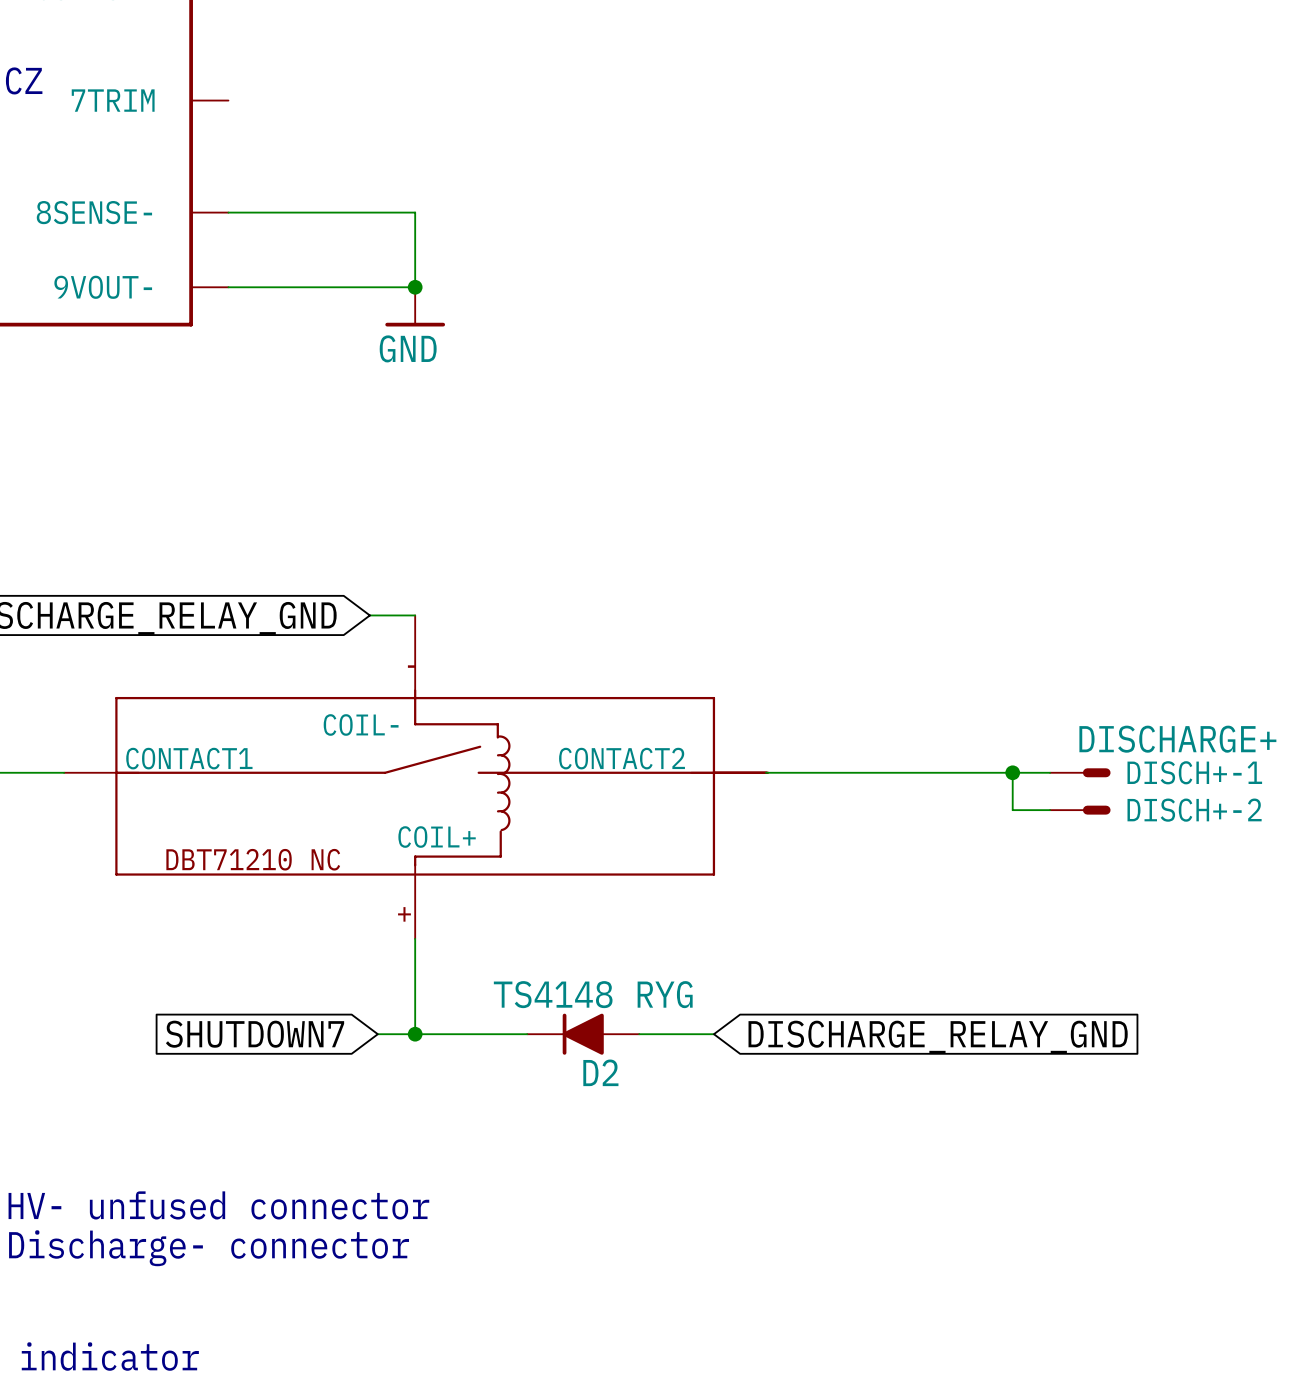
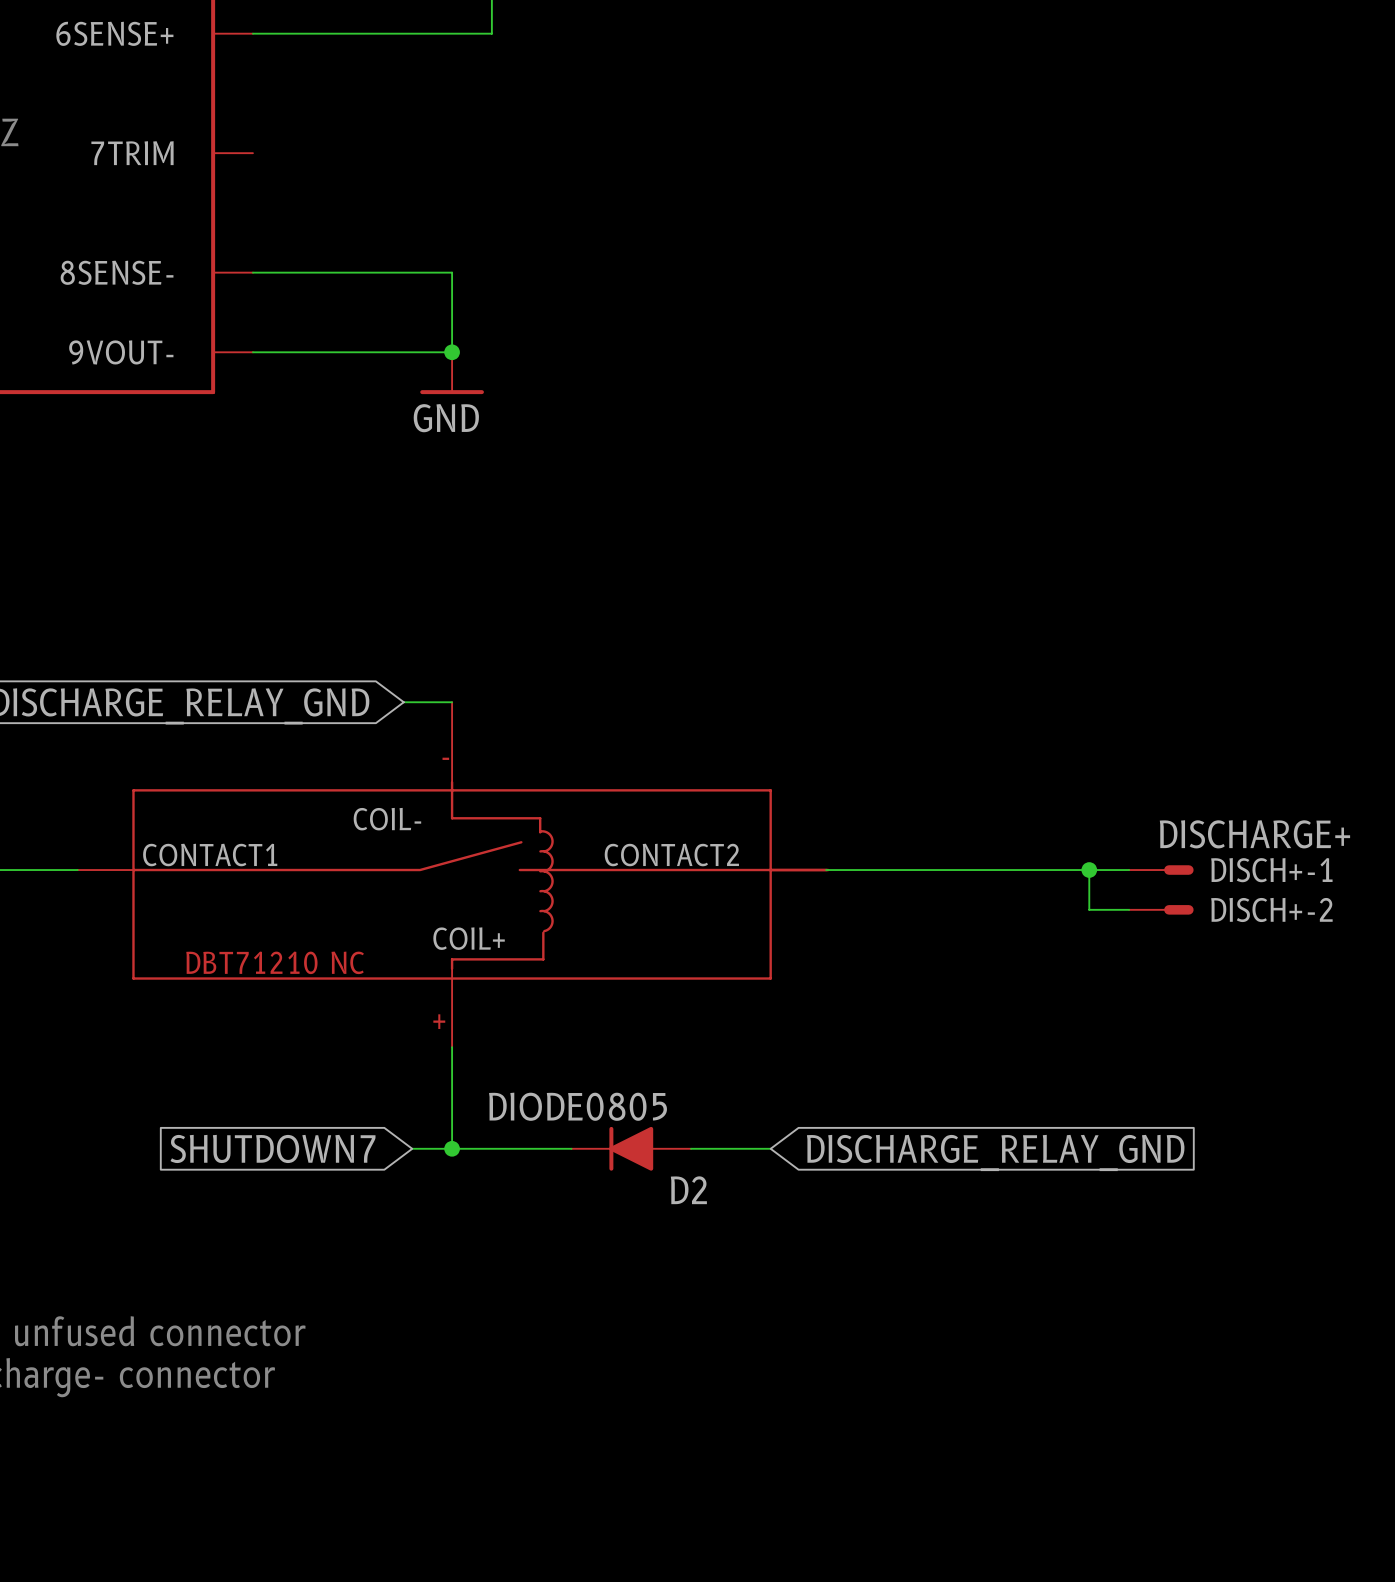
D2 value: TS4148 RYG (593, 994) -> DIODE0805 (578, 1106)
D2 name position: D2 (600, 1072) -> D2 (688, 1190)

